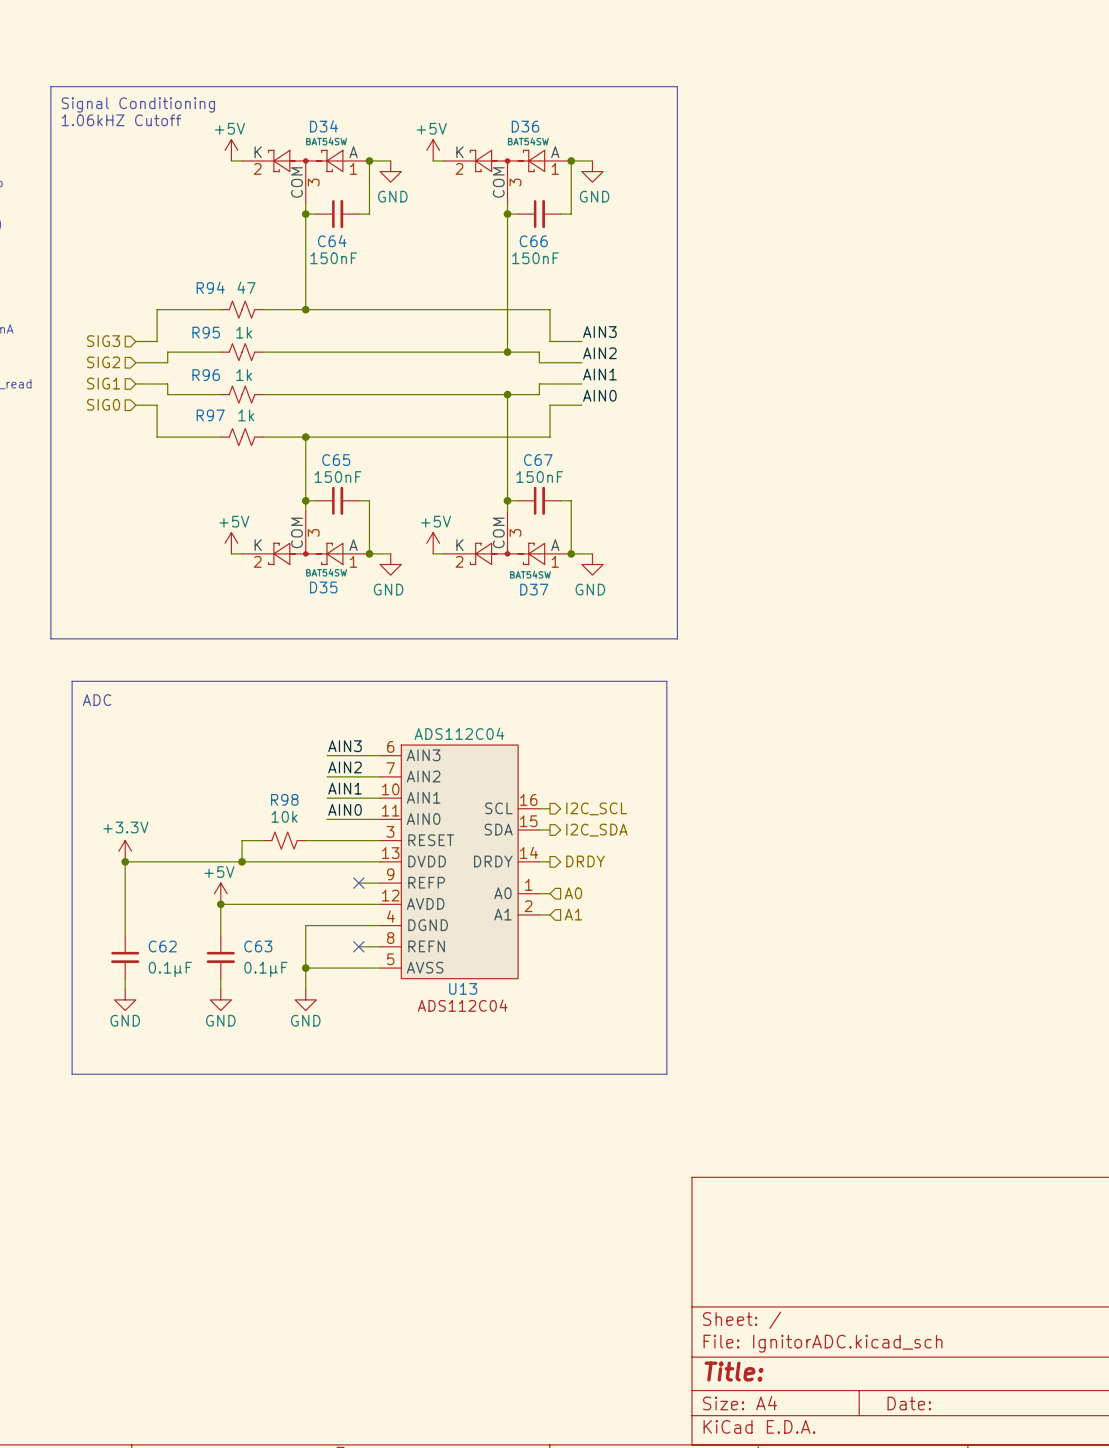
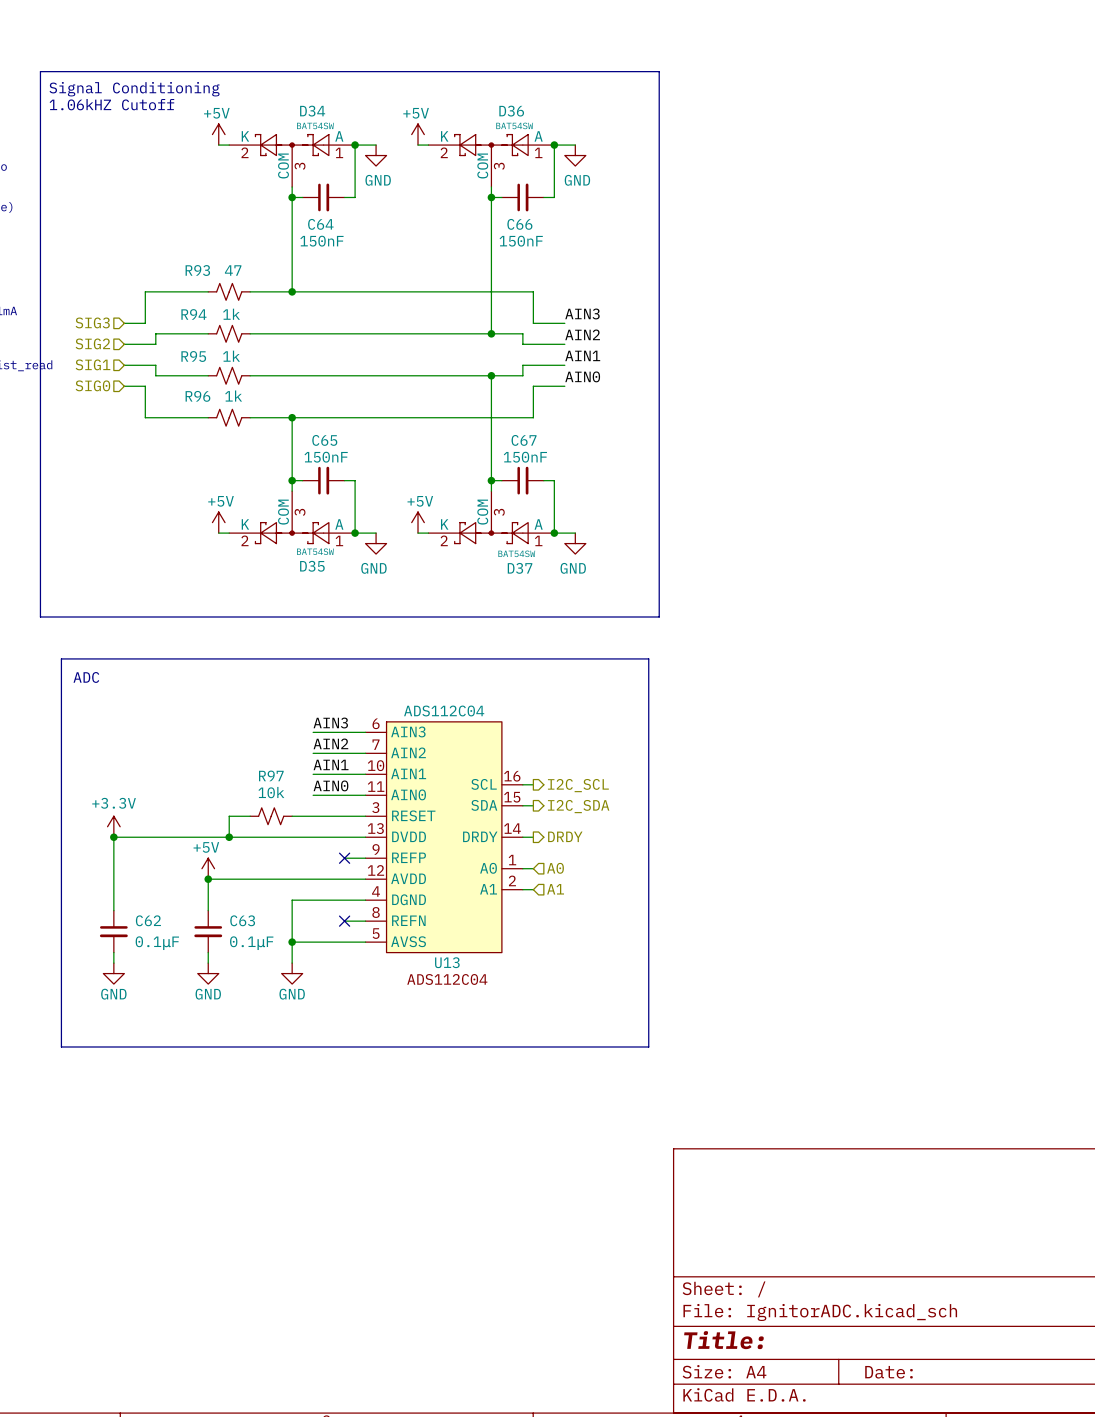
R94 name: R94 (210, 287) -> R93 (197, 270)
R95 name: R95 (206, 332) -> R94 (193, 314)
R96 name: R96 (206, 375) -> R95 (193, 356)
R97 name: R97 (210, 415) -> R96 (197, 396)
R98 name: R98 (284, 799) -> R97 (271, 775)

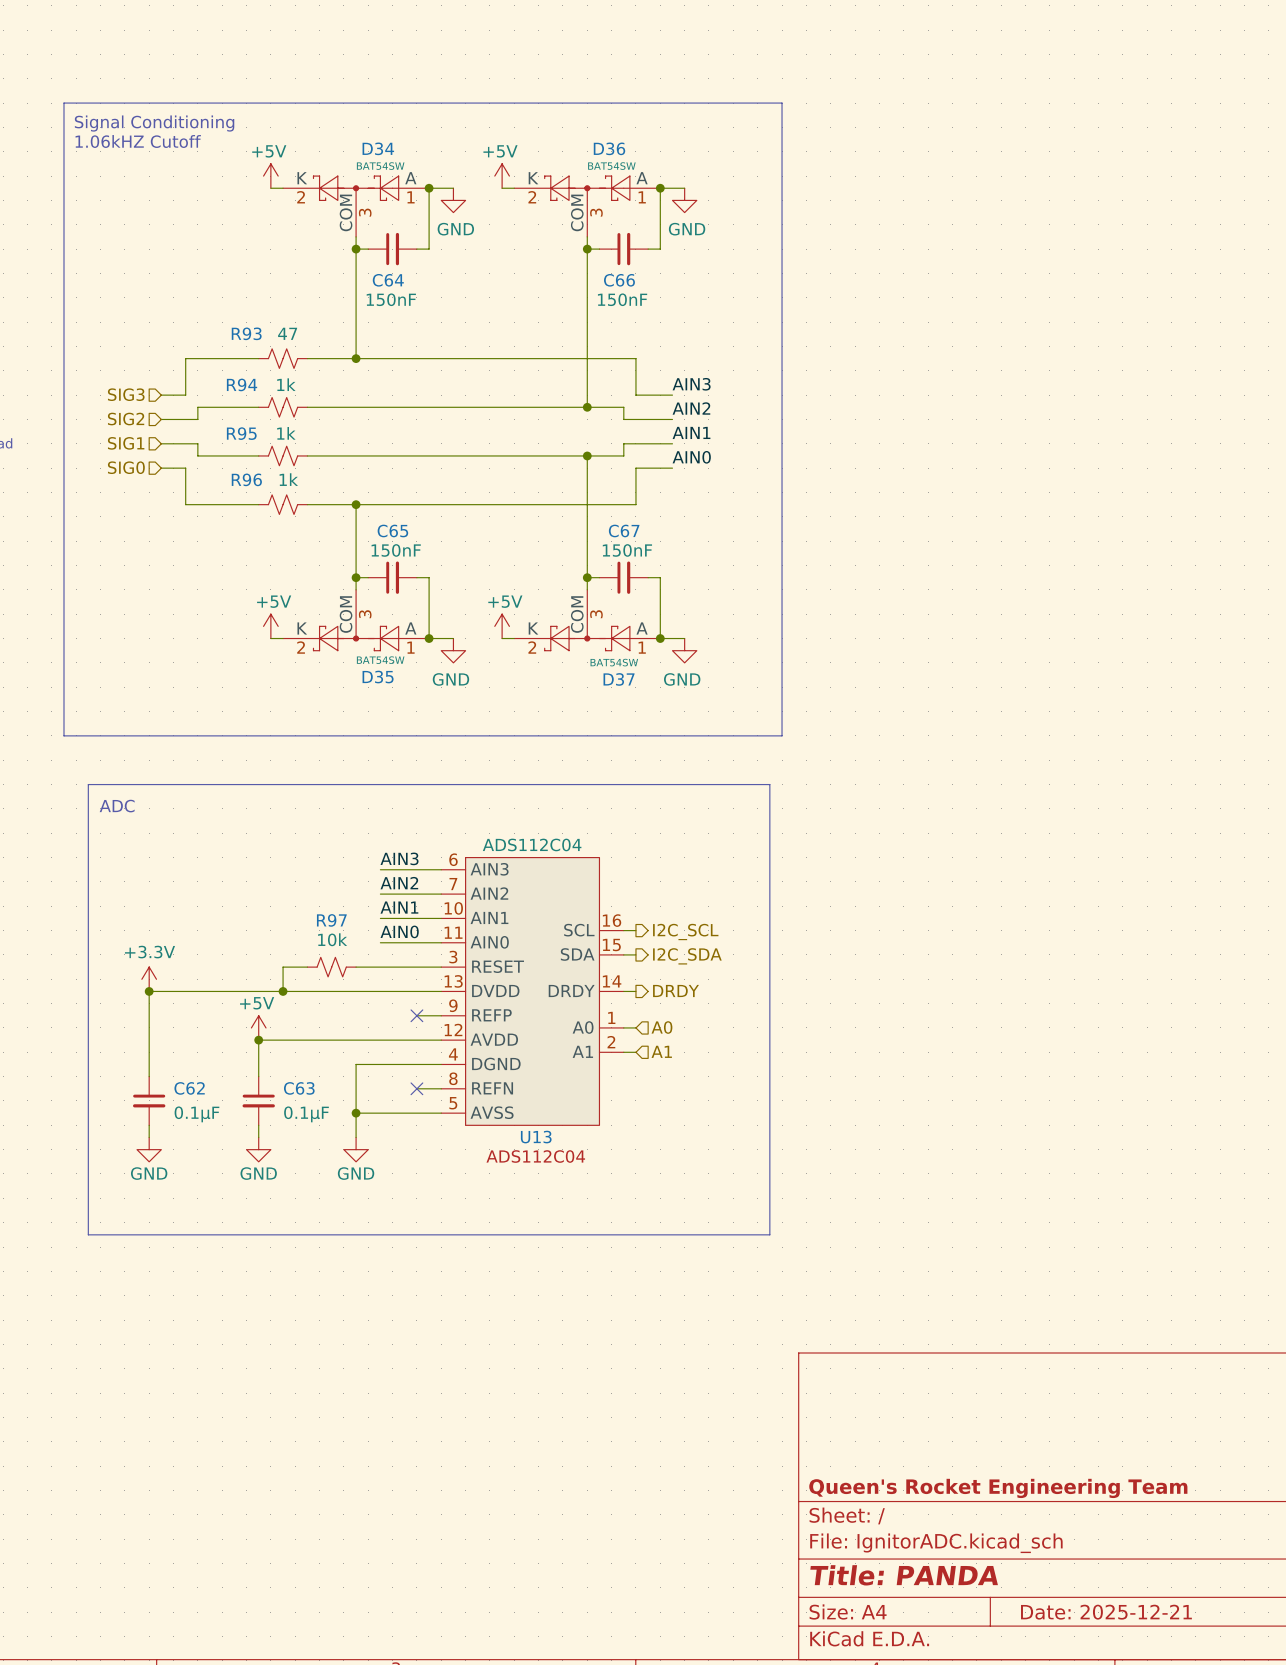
title block: none -> Queen's Rocket Engineering Team (998, 1488)
title block: Title: (723, 1340) -> Title: PANDA (904, 1575)
title block: Date: (888, 1372) -> Date: 2025-12-21 (1106, 1612)

